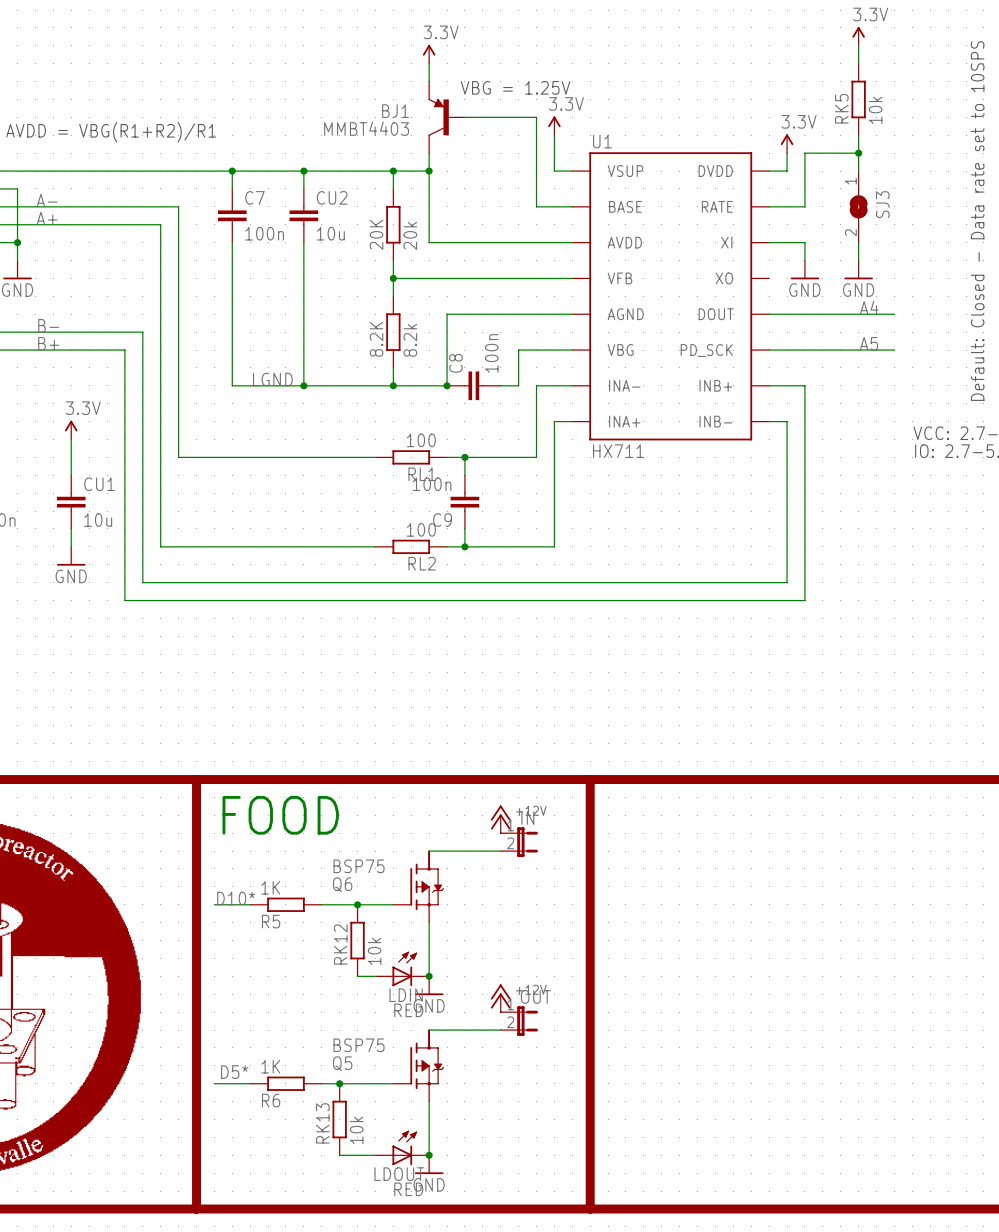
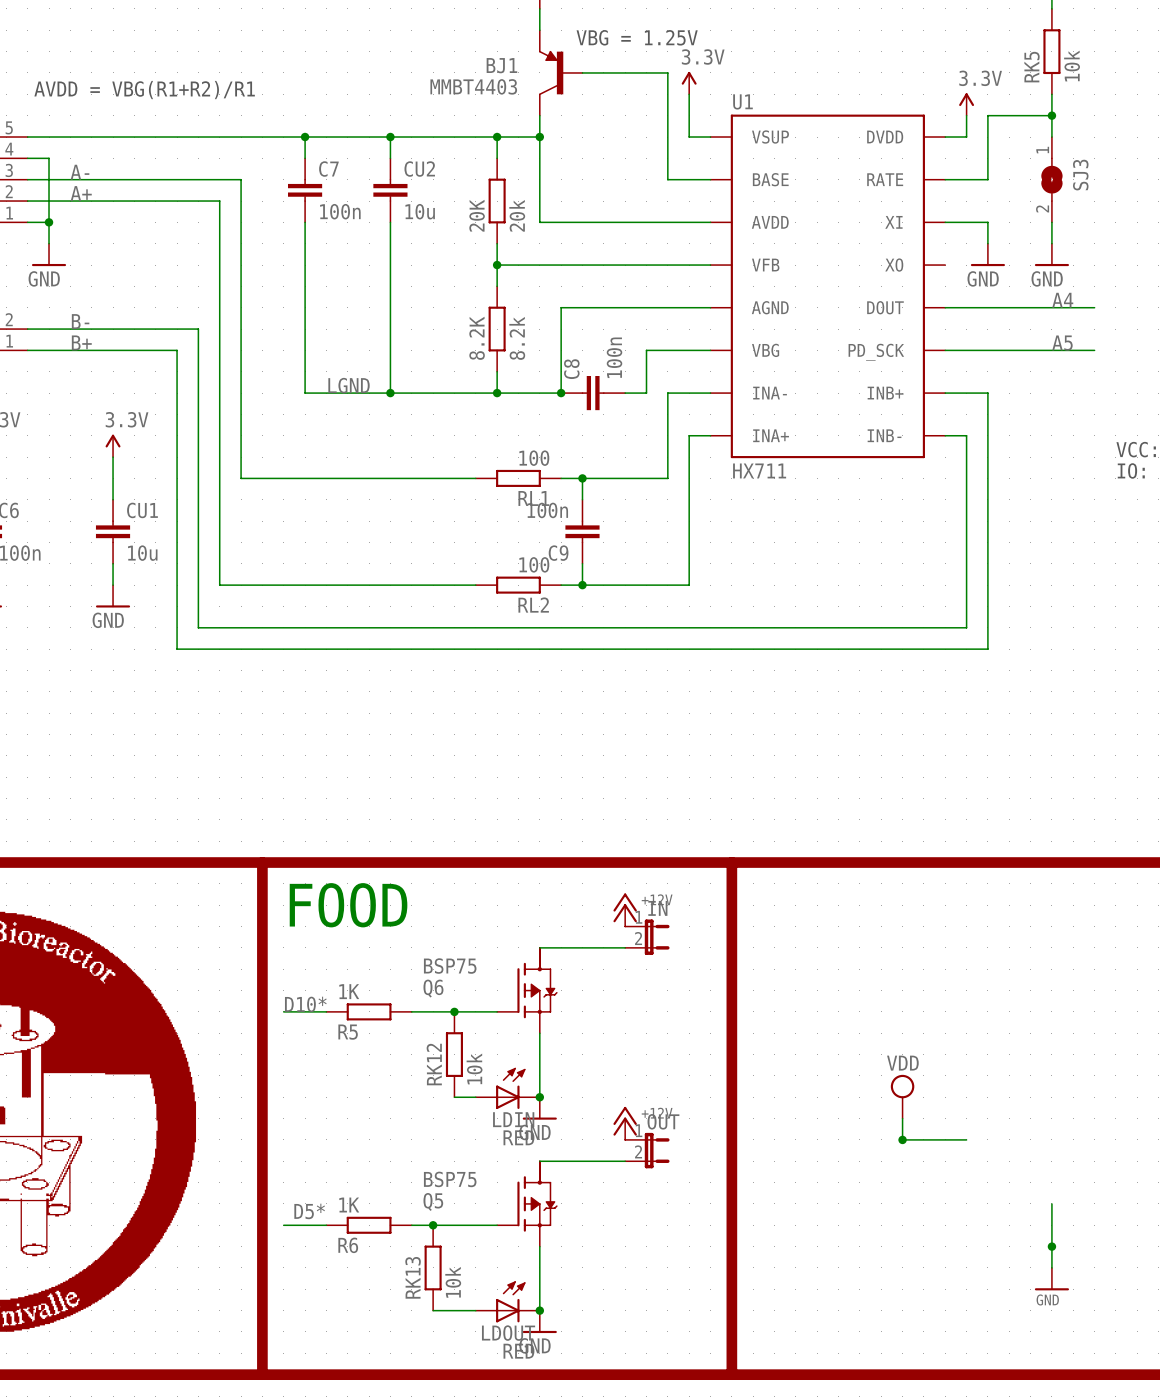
power symbol: none -> VDD (902, 1096)
wire: none -> (902, 1118) (902, 1139) (966, 1139)
junction: none -> (902, 1139)
wire: none -> (1051, 1203) (1051, 1267)
junction: none -> (1051, 1246)
power symbol: none -> GND (1051, 1279)

